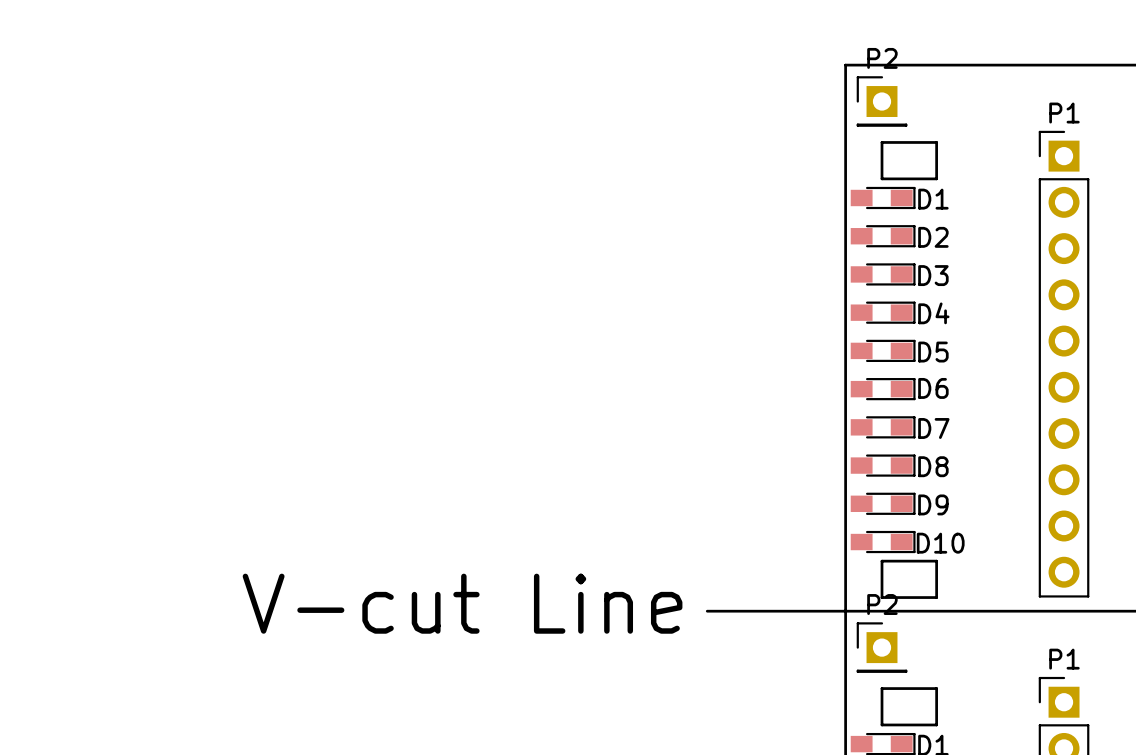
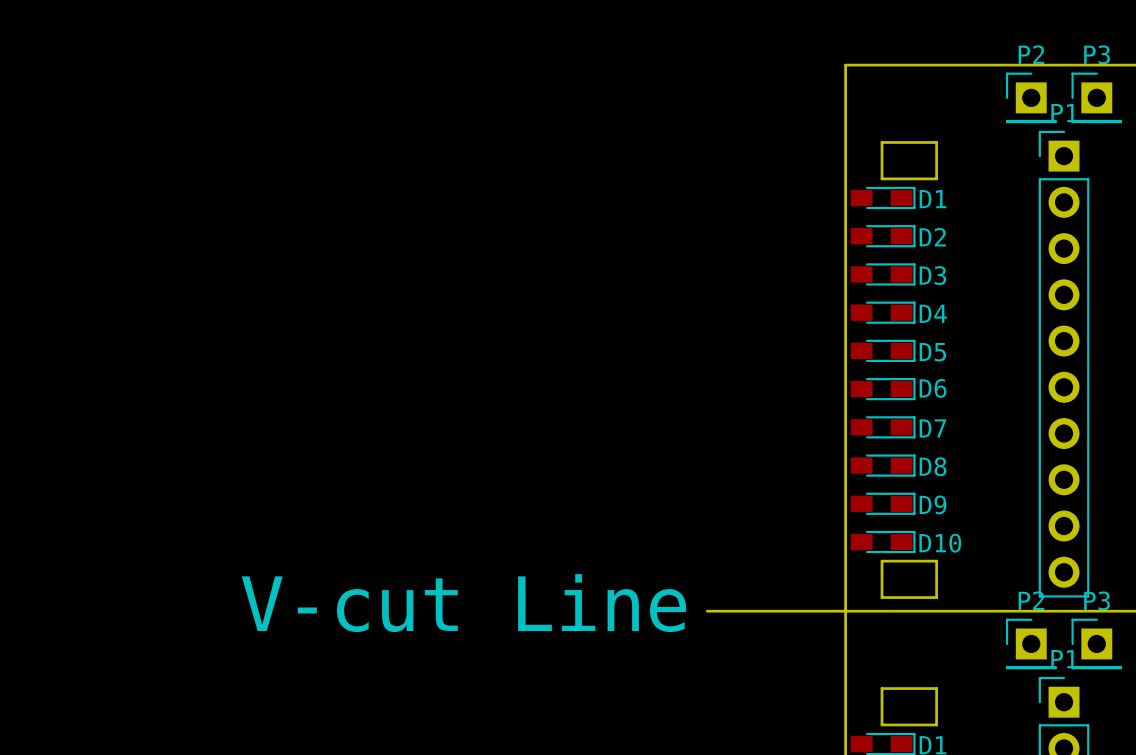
P3: none -> (1096, 97)
P2 position: (882, 101) -> (1031, 97)
P3: none -> (1096, 643)
P2 position: (882, 647) -> (1031, 643)

